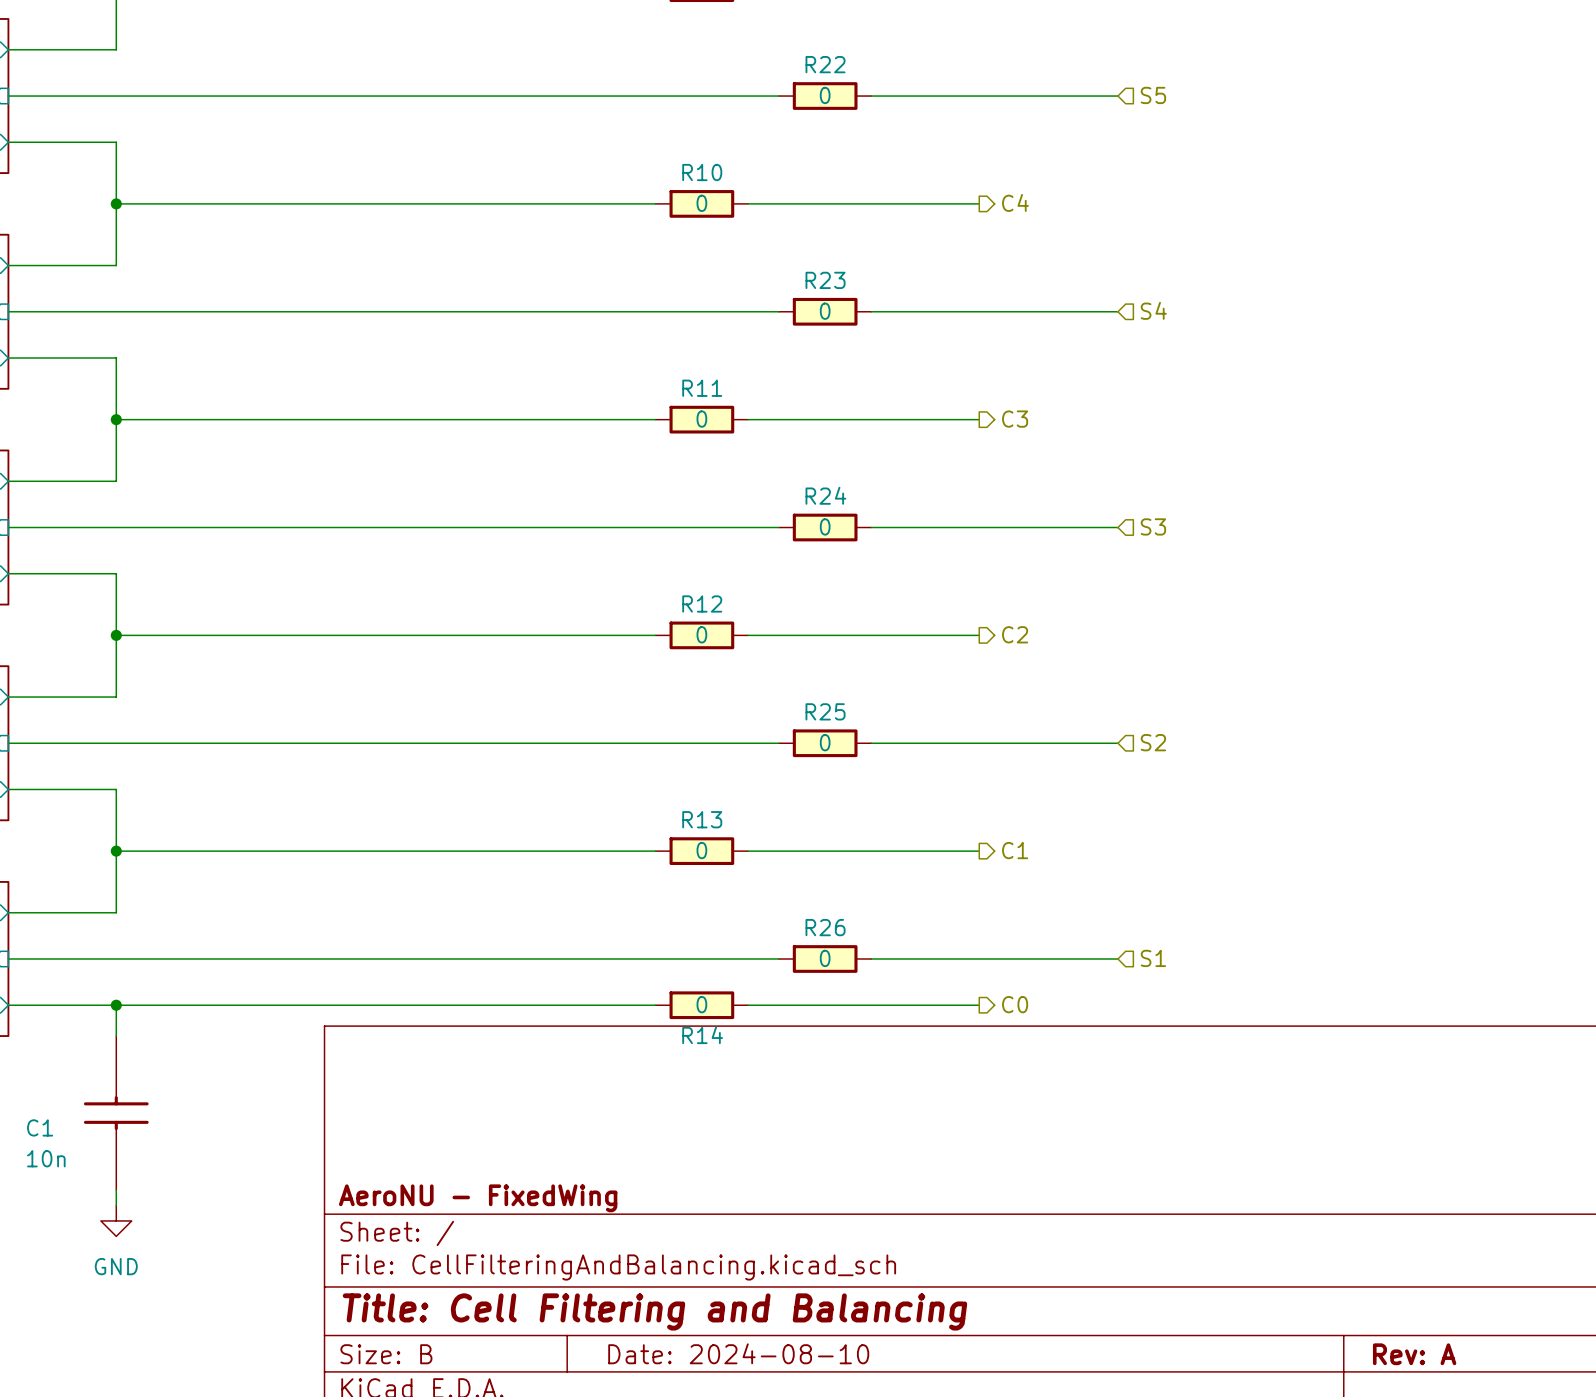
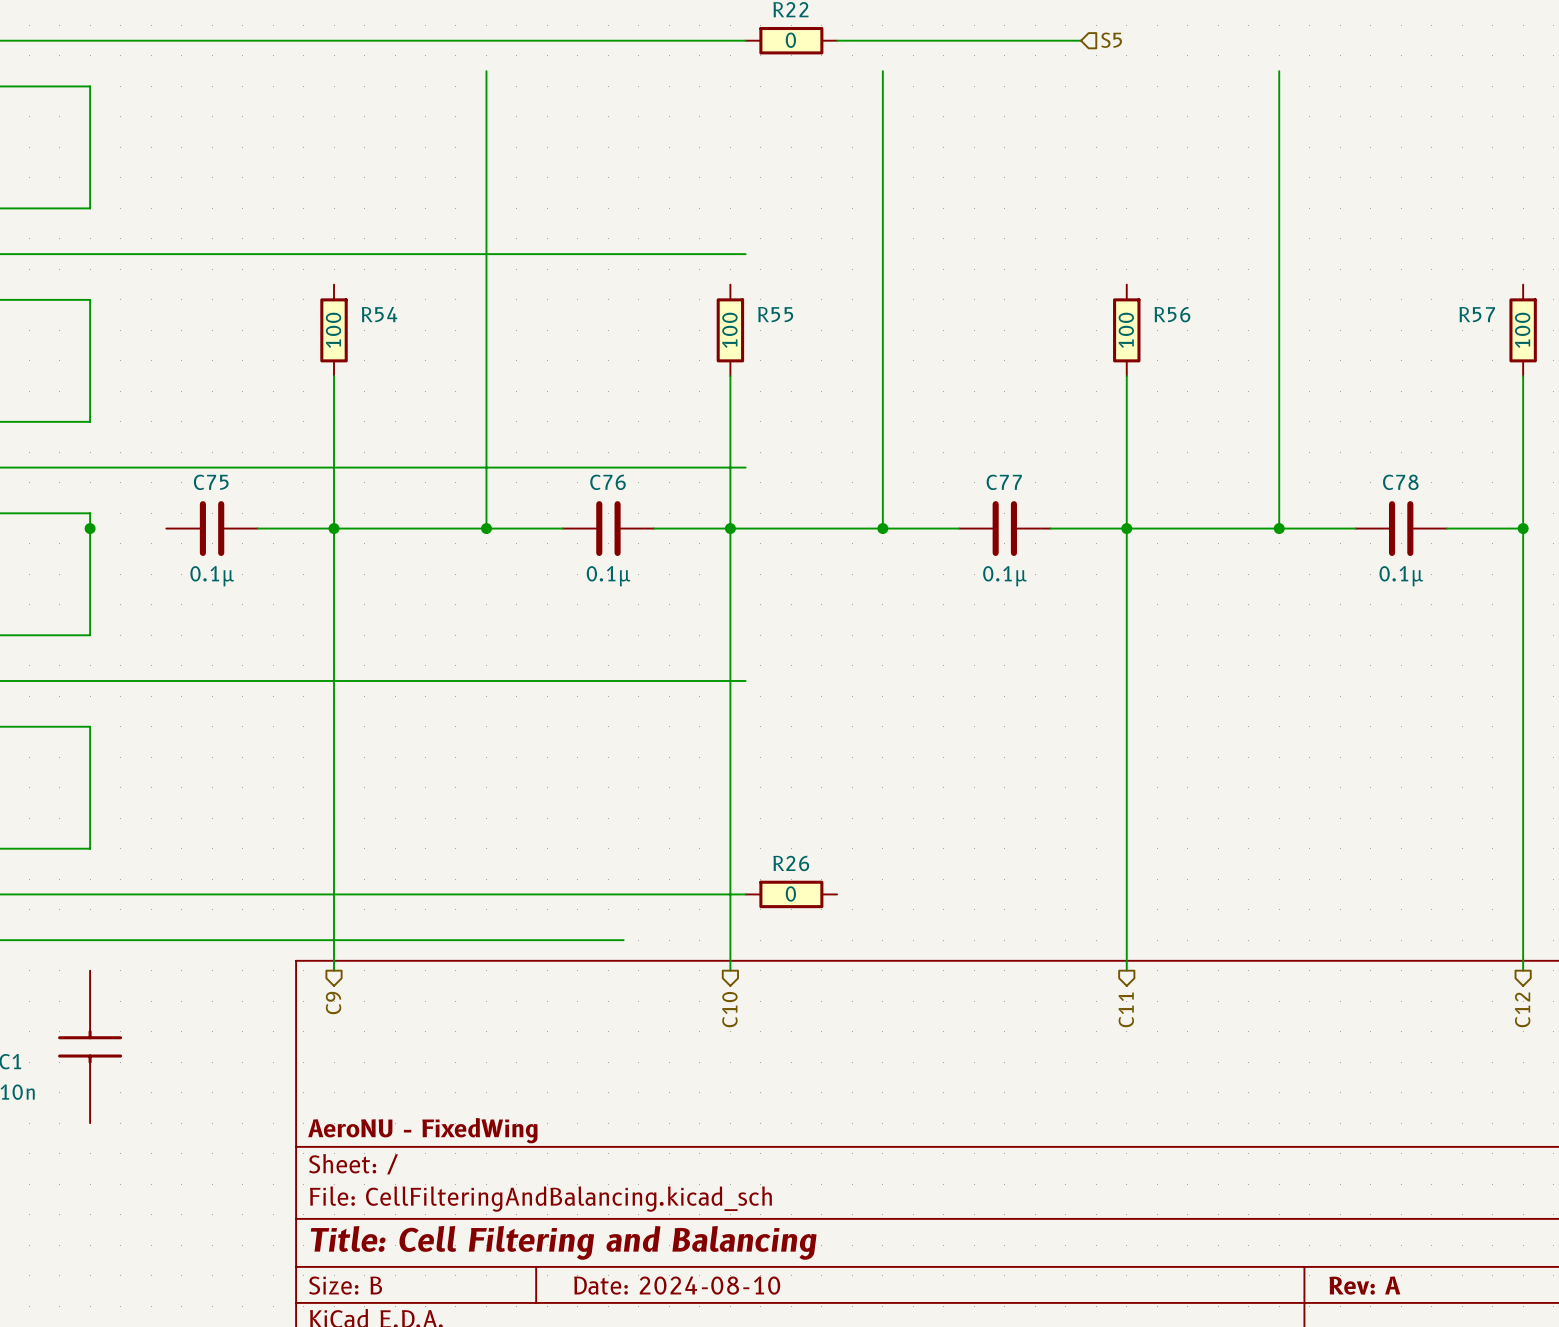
wire: none -> (486, 71) (486, 528)
wire: none -> (882, 71) (882, 528)
wire: none -> (1279, 71) (1279, 528)
hierarchical label: C4 (1015, 202) -> none
wire: (116, 203) (655, 203) -> none
junction: (116, 203) -> none
R10: 0 (701, 203) -> none
wire: (748, 203) (979, 203) -> none
hierarchical label: S4 (1153, 310) -> none
R23: 0 (825, 311) -> none
wire: (871, 311) (1117, 311) -> none
R54: none -> 100 (334, 330)
R55: none -> 100 (730, 330)
R56: none -> 100 (1126, 330)
R57: none -> 100 (1523, 330)
wire: (116, 419) (655, 419) -> none
junction: (116, 419) -> none
R11: 0 (701, 419) -> none
wire: (748, 419) (979, 419) -> none
hierarchical label: C3 (1015, 419) -> none
wire: none -> (334, 376) (334, 970)
wire: none -> (730, 376) (730, 970)
wire: none -> (1126, 376) (1126, 970)
wire: none -> (1523, 376) (1523, 970)
hierarchical label: S3 (1153, 526) -> none
R24: 0 (825, 527) -> none
wire: (871, 527) (1117, 527) -> none
C75: none -> 0.1µ (212, 528)
wire: none -> (257, 528) (562, 528)
junction: none -> (334, 528)
junction: none -> (486, 528)
C76: none -> 0.1µ (608, 528)
wire: none -> (654, 528) (959, 528)
junction: none -> (730, 528)
junction: none -> (882, 528)
C77: none -> 0.1µ (1004, 528)
wire: none -> (1050, 528) (1355, 528)
junction: none -> (1126, 528)
junction: none -> (1279, 528)
C78: none -> 0.1µ (1401, 528)
wire: none -> (1446, 528) (1523, 528)
junction: none -> (1523, 528)
hierarchical label: C2 (1015, 634) -> none
wire: (116, 635) (655, 635) -> none
junction position: (116, 635) -> (90, 528)
R12: 0 (701, 635) -> none
wire: (748, 635) (979, 635) -> none
hierarchical label: S2 (1153, 742) -> none
R25: 0 (825, 743) -> none
wire: (871, 743) (1117, 743) -> none
hierarchical label: C1 (1015, 850) -> none
wire: (116, 851) (655, 851) -> none
junction: (116, 851) -> none
R13: 0 (701, 851) -> none
wire: (748, 851) (979, 851) -> none
hierarchical label: S1 (1153, 958) -> none
wire: (871, 959) (1117, 959) -> none
hierarchical label: C0 (1015, 1004) -> none
wire: (116, 1005) (116, 1036) -> none
junction: (116, 1005) -> none
R14: 0 (701, 1005) -> none
wire: (748, 1005) (979, 1005) -> none
hierarchical label: none -> C9 (333, 1003)
hierarchical label: none -> C10 (729, 1009)
hierarchical label: none -> C11 (1126, 1009)
hierarchical label: none -> C12 (1522, 1009)
wire: (116, 1190) (116, 1205) -> none
power symbol: GND (116, 1220) -> none

